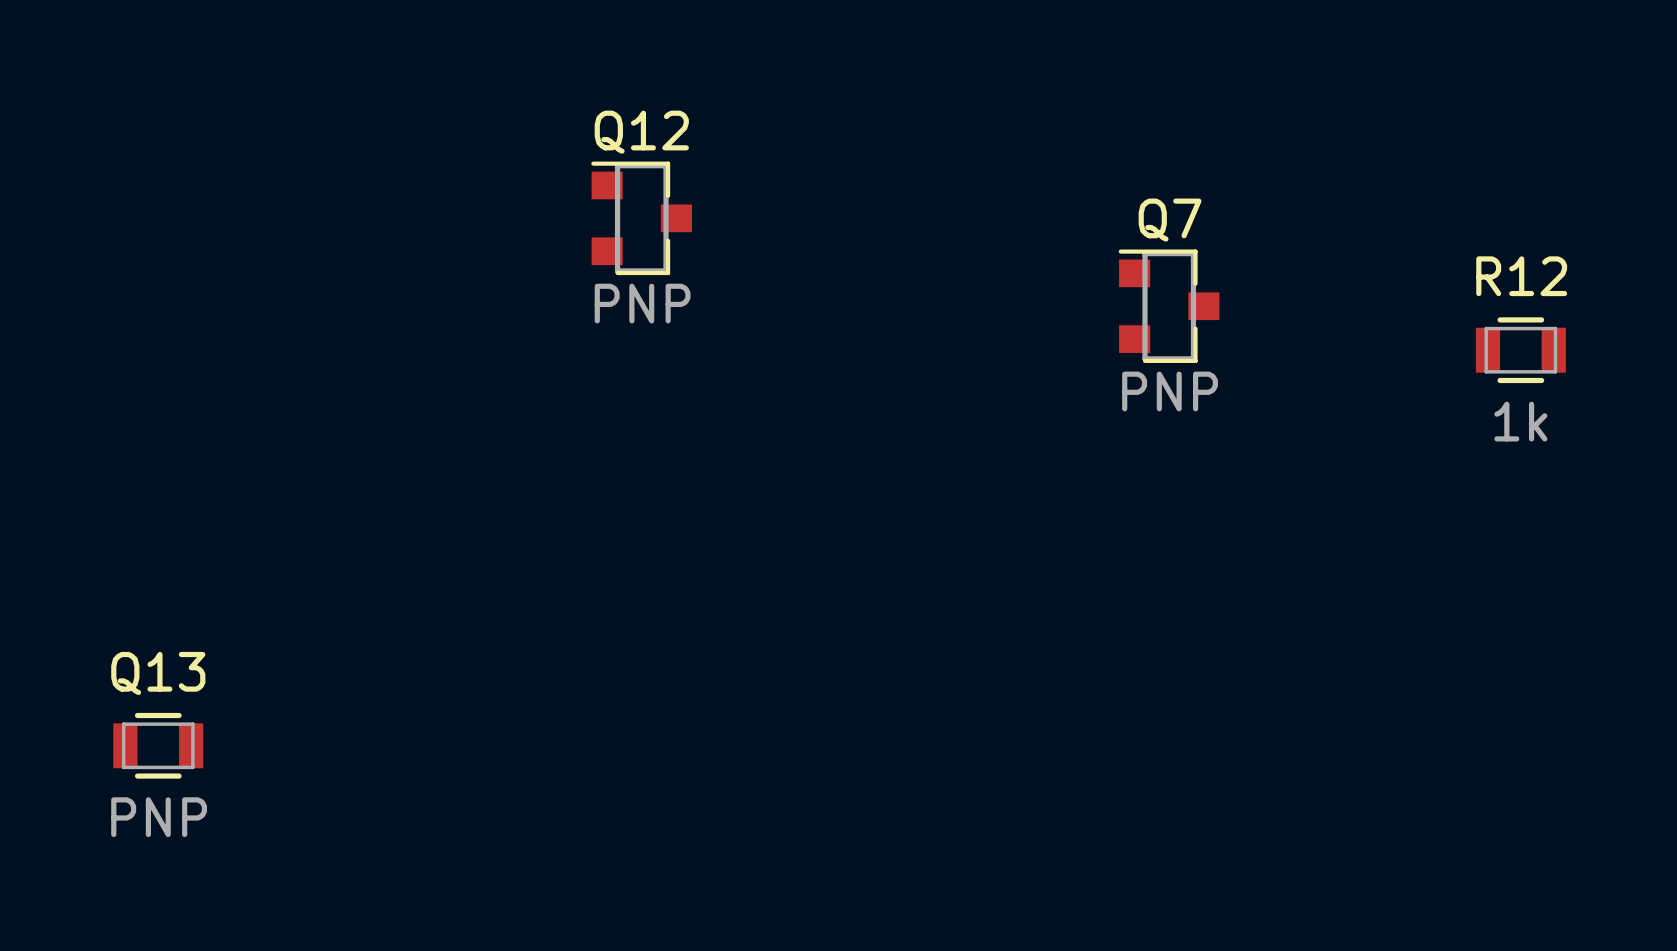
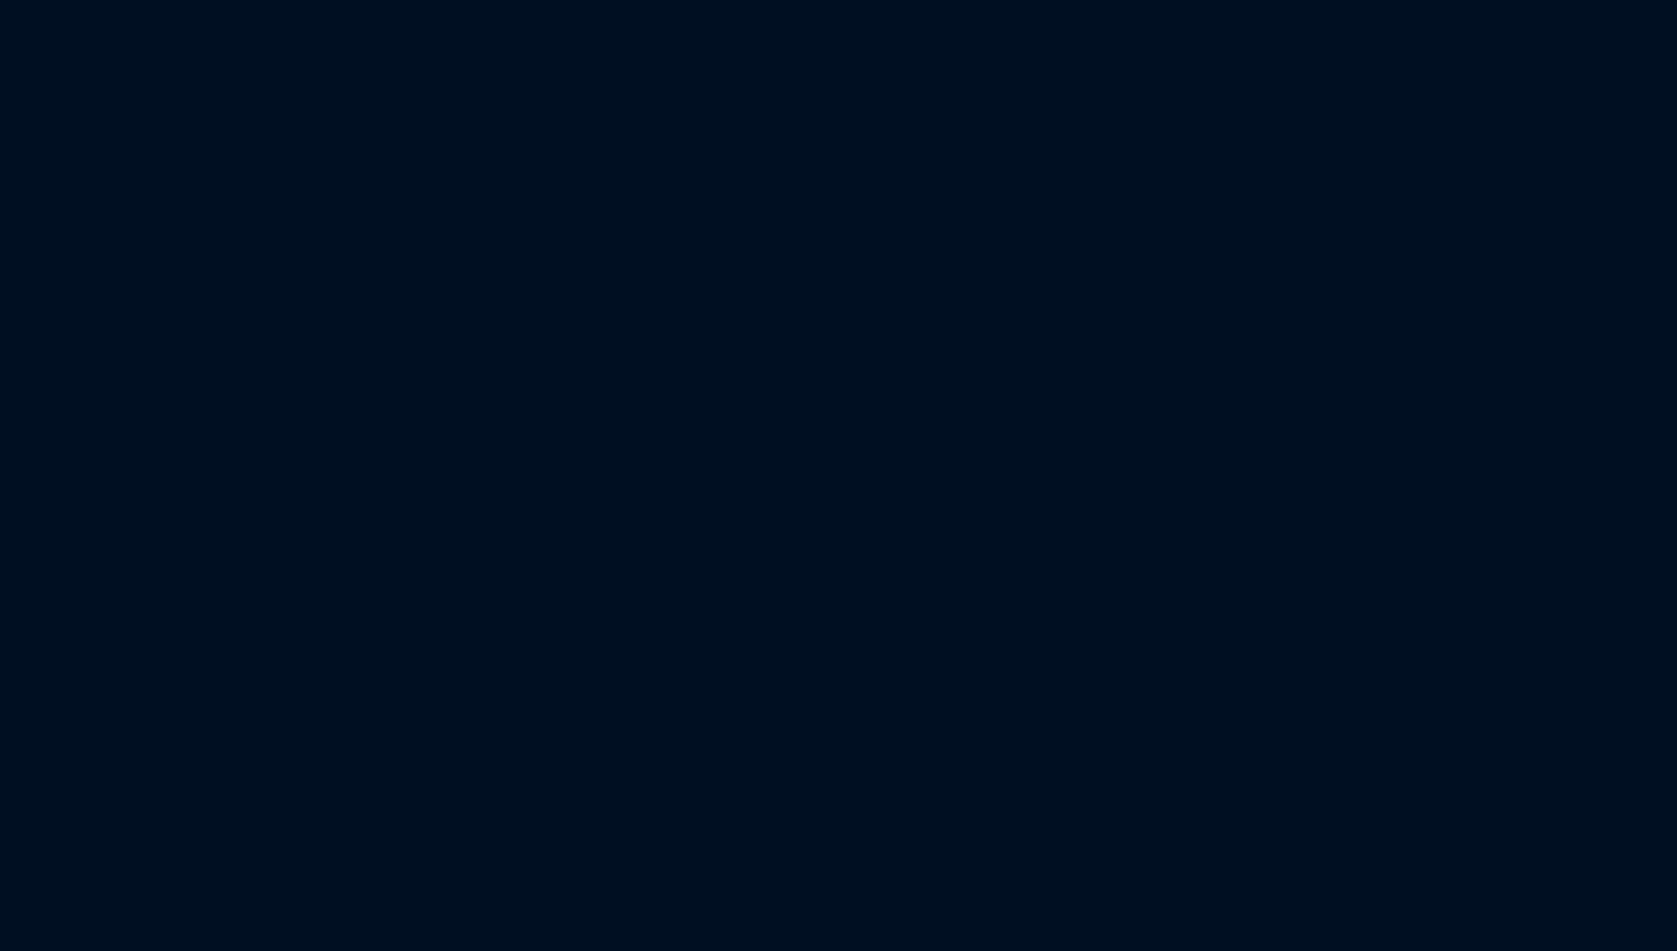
Q12: PNP (641, 218) -> none
Q7: PNP (1169, 306) -> none
R12: 1k (1520, 350) -> none
Q13: PNP (158, 745) -> none

